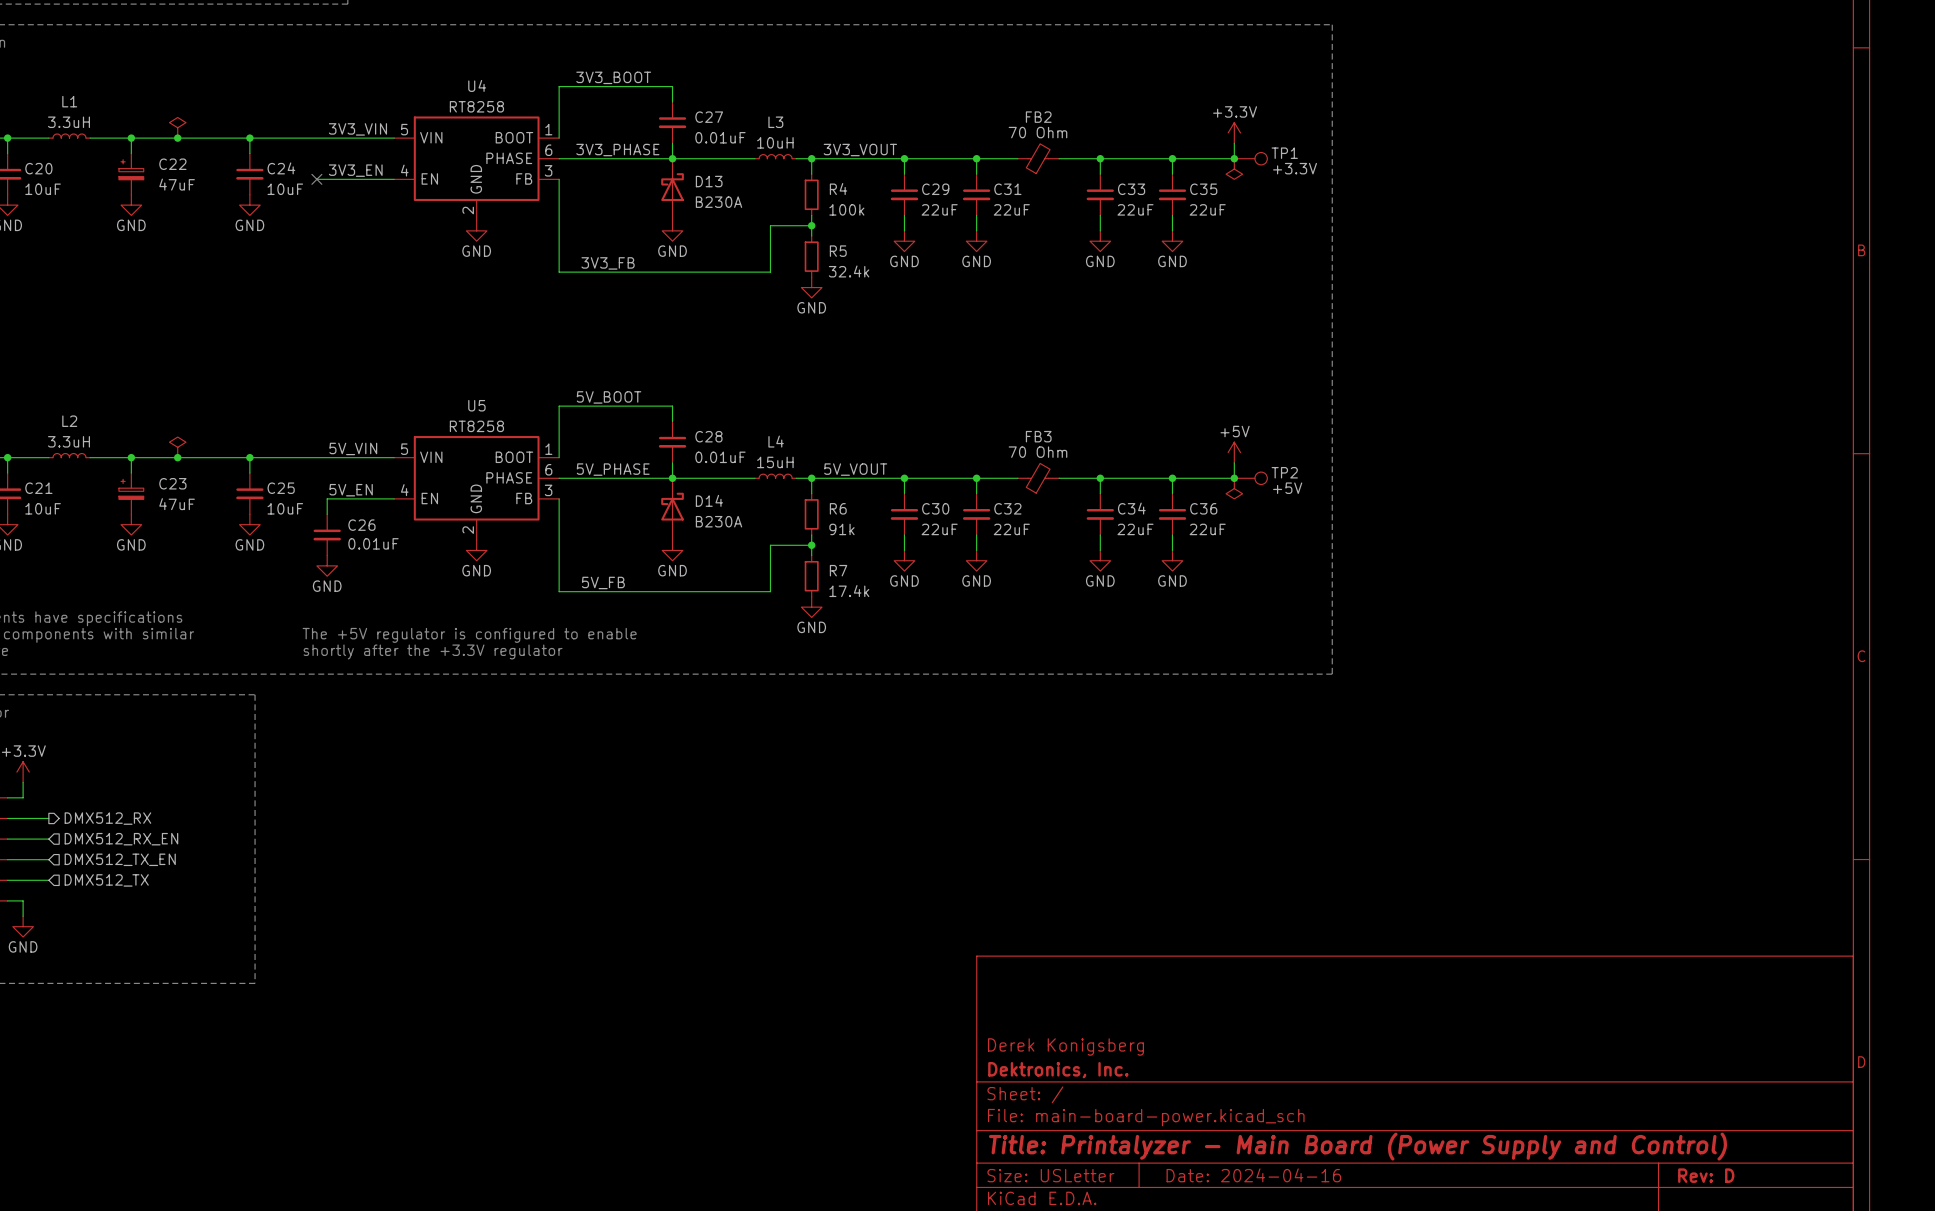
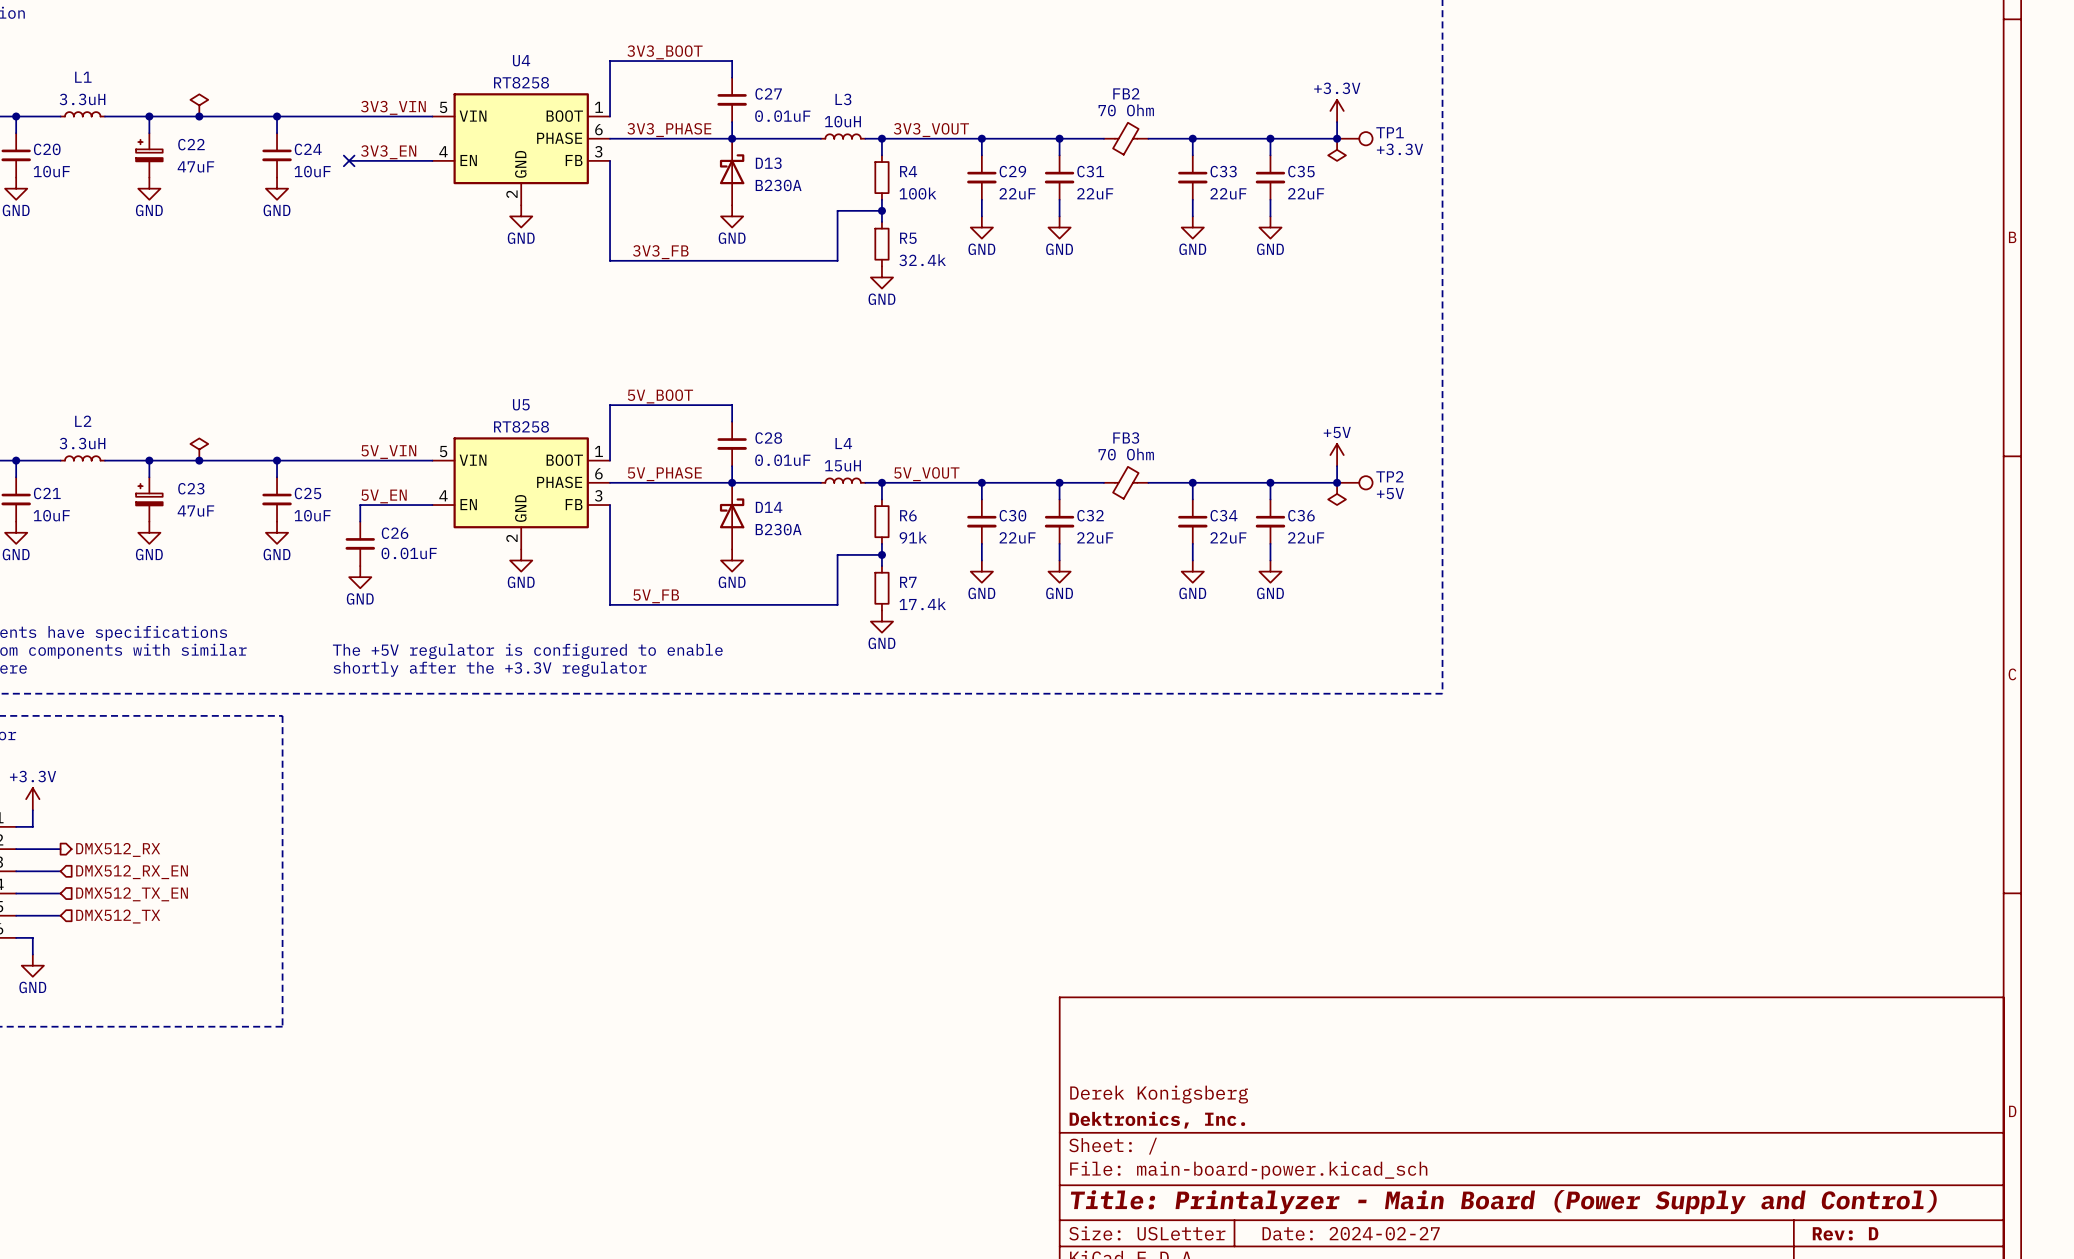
title block: Date: 2024-04-16 (1253, 1175) -> Date: 2024-02-27 (1351, 1233)

